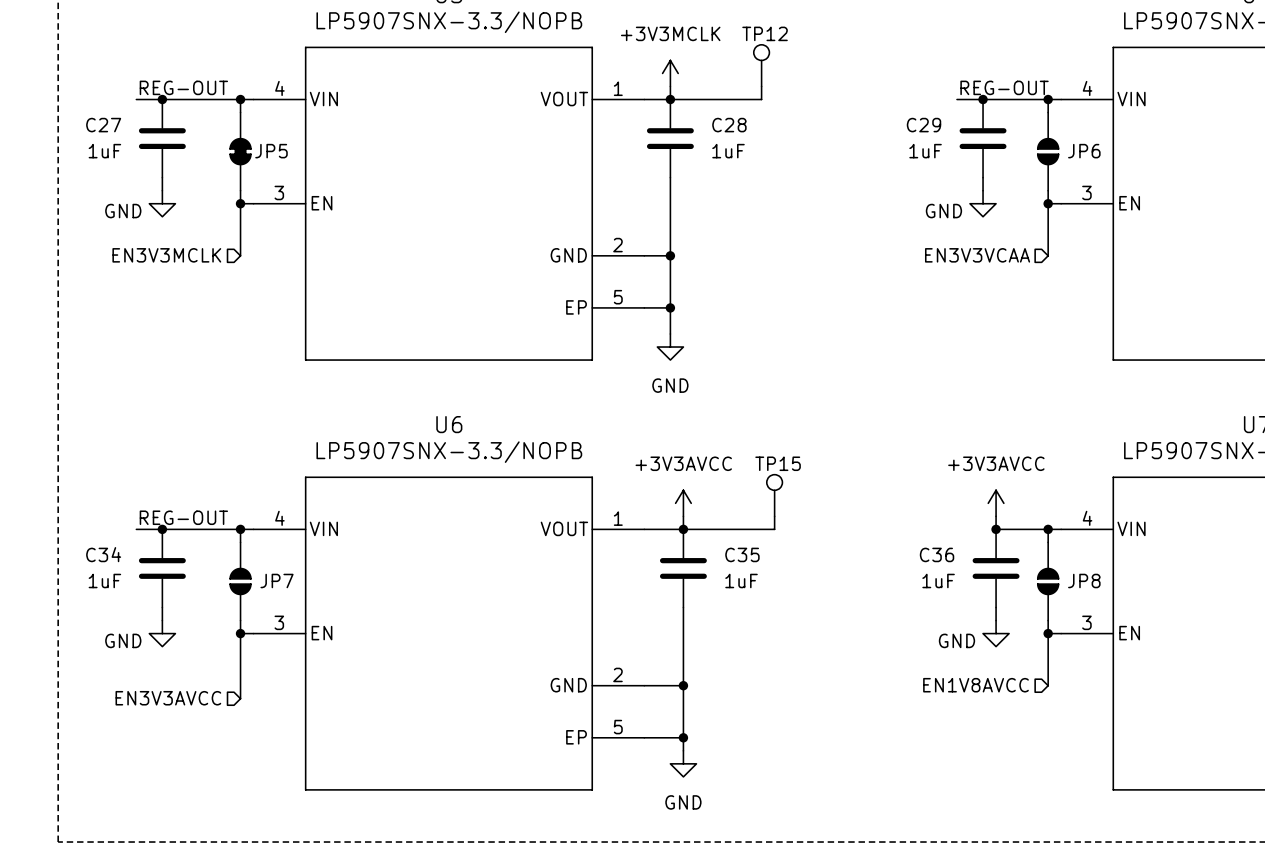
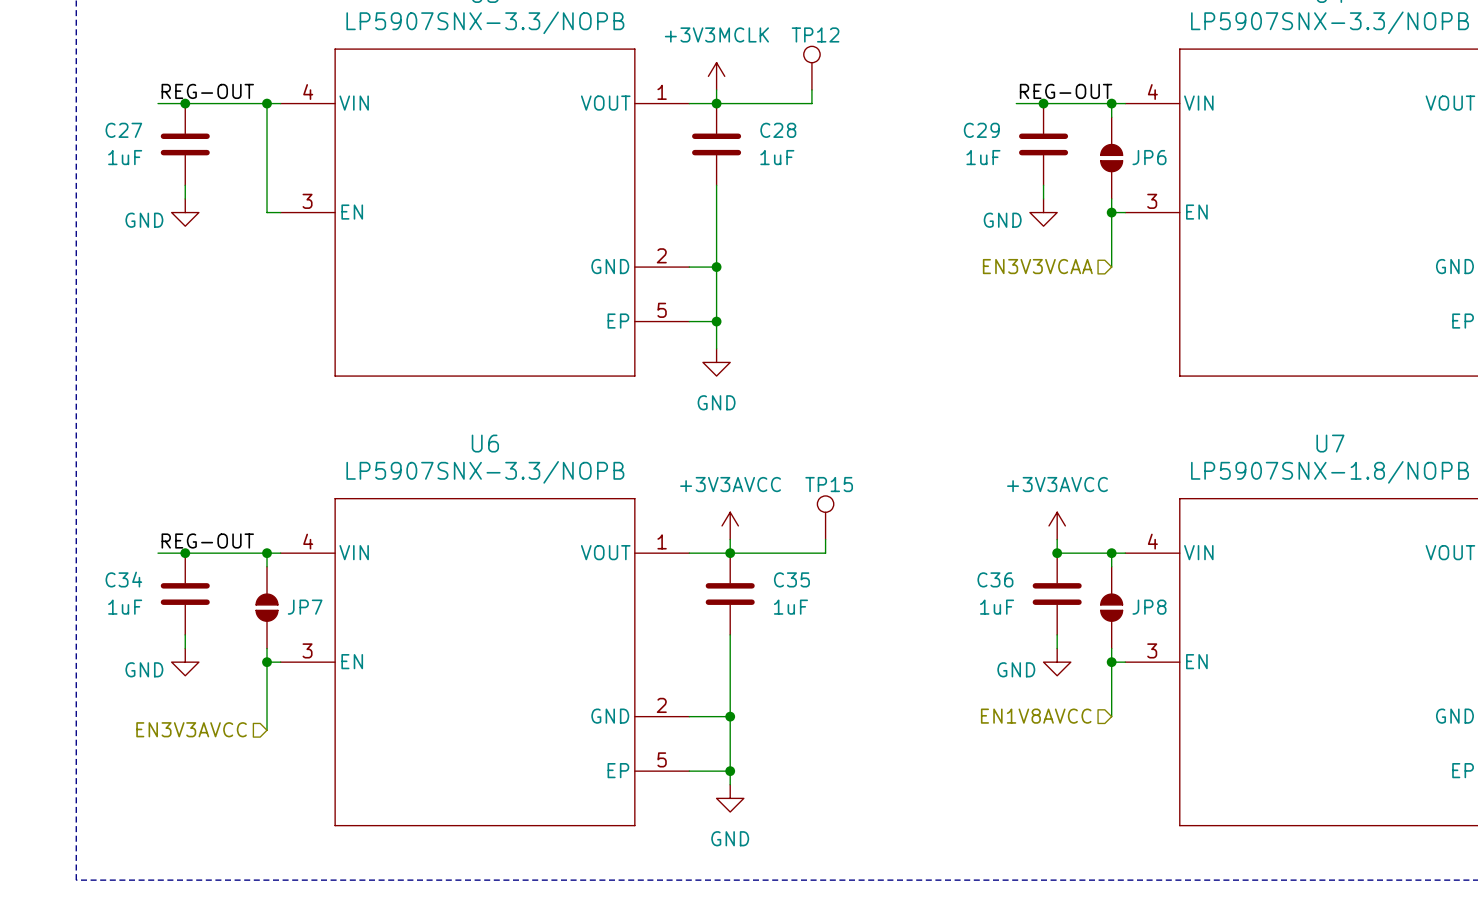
JP5: (240, 151) -> none
wire: (240, 203) (240, 255) -> none
junction: (240, 203) -> none
hierarchical label: EN3V3MCLK (166, 255) -> none

